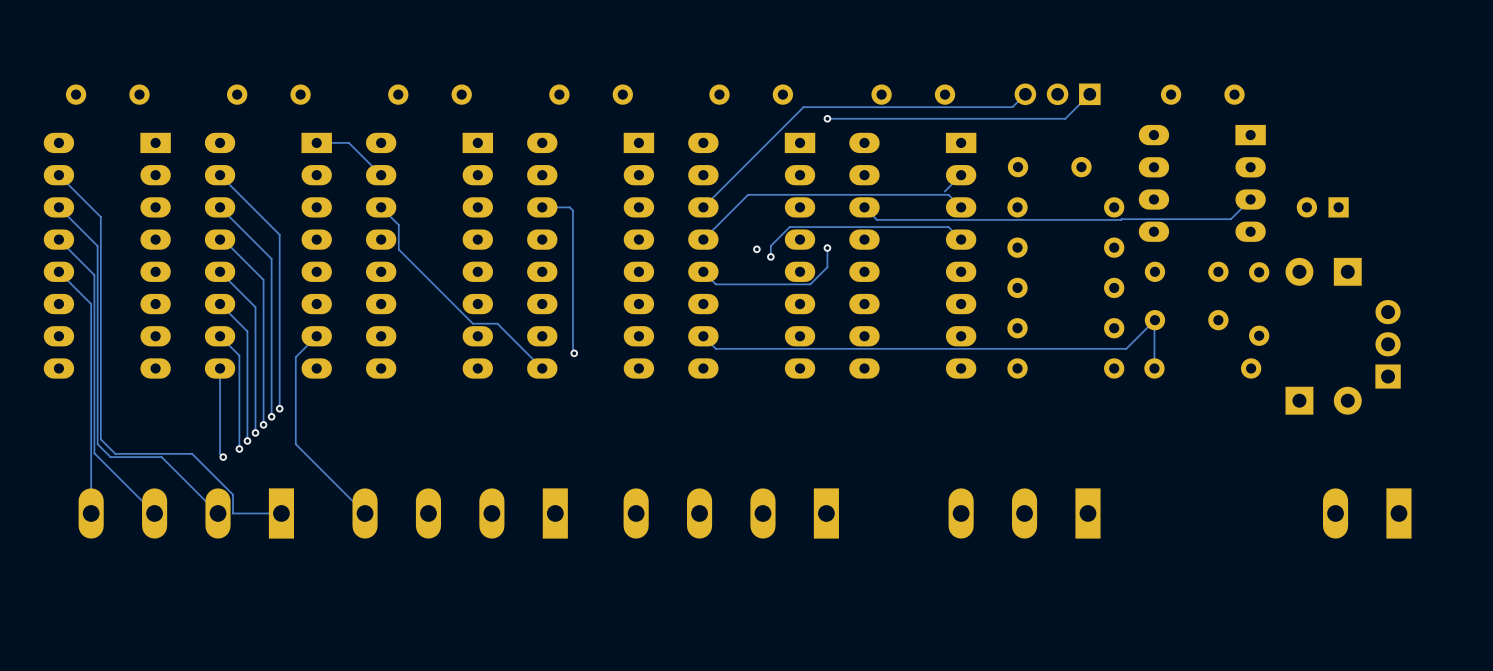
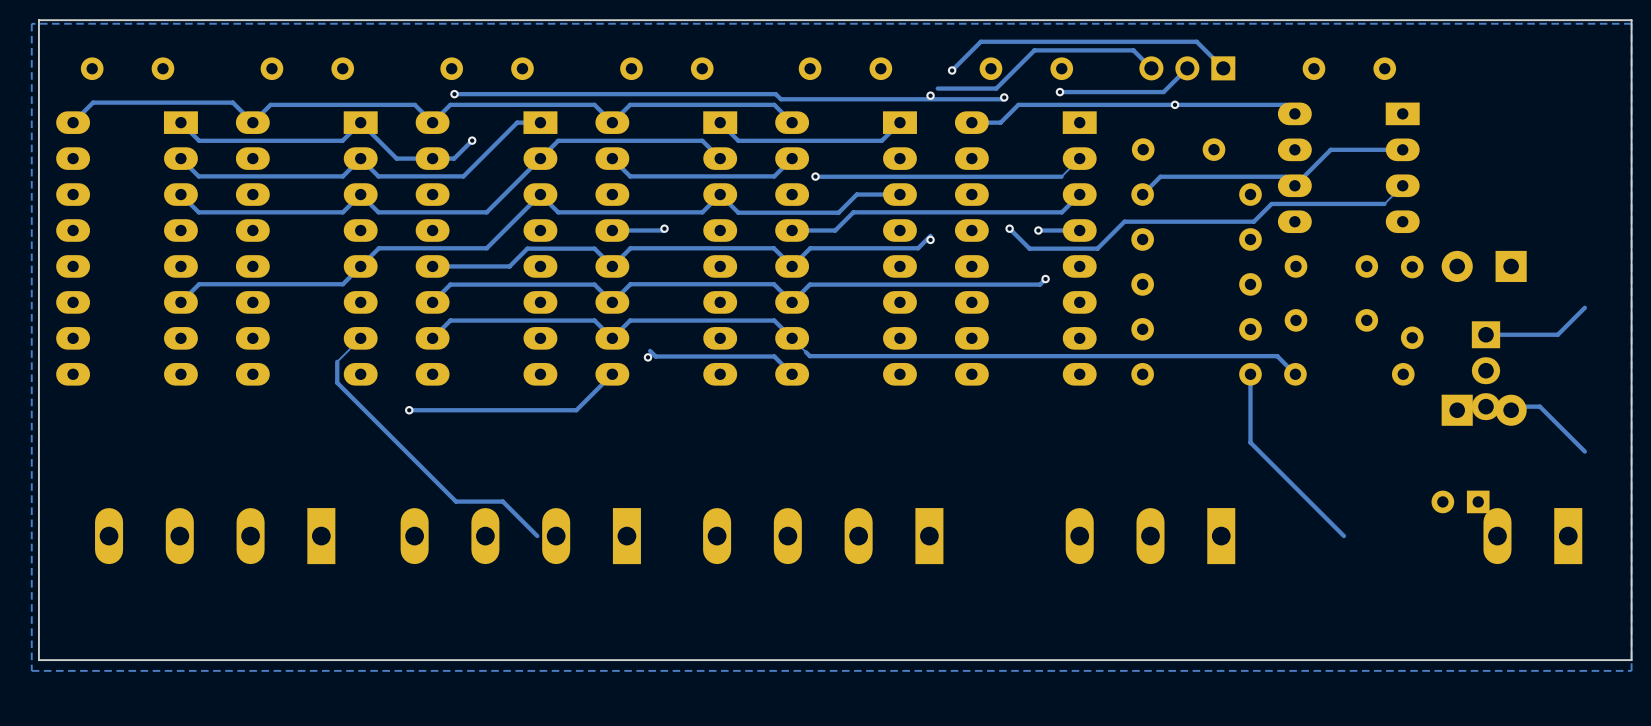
board edge: none -> (1631, 20) (38, 20) (38, 660) (1631, 660) (1631, 20)
zone outline: none -> (1631, 23) (31, 23) (31, 670) (1631, 670) (1631, 23)
track: (1025, 94) (1012, 107) (803, 107) (703, 207) -> (1151, 68) (1133, 50) (1034, 50) (996, 88) (937, 88)
track: none -> (1187, 68) (1163, 92) (1059, 92)
track: (1089, 94) (1065, 118) (827, 118) -> (1223, 68) (1196, 41) (980, 41) (952, 70)
via: none -> (952, 70)
via: none -> (1059, 92)
track: none -> (454, 94) (775, 94) (780, 99) (1002, 99) (1004, 97)
via: none -> (454, 94)
via: none -> (1004, 97)
via: none -> (1175, 104)
track: none -> (1294, 113) (1285, 104) (1018, 104) (1000, 122) (971, 122)
track: none -> (180, 122) (199, 140) (342, 140) (360, 122) (396, 158) (454, 158) (472, 140)
track: (316, 142) (348, 142) (381, 175) -> none
track: none -> (540, 122) (517, 122) (463, 176) (378, 176) (360, 158) (342, 176) (198, 176) (180, 158)
track: none -> (792, 122) (774, 104) (630, 104) (612, 122) (594, 104) (450, 104) (432, 122) (414, 104) (270, 104) (252, 122) (232, 102) (93, 102) (73, 122)
track: none -> (899, 122) (881, 140) (738, 140) (720, 122)
via: none -> (472, 140)
track: none -> (1402, 149) (1330, 149) (1294, 185) (1285, 176) (1160, 176) (1142, 194)
track: (58, 175) (100, 217) (100, 439) (115, 453) (192, 453) (232, 494) (232, 513) (281, 513) -> none
track: (220, 175) (279, 234) (279, 408) -> none
track: none -> (720, 158) (702, 140) (558, 140) (486, 212) (378, 212) (360, 194) (342, 212) (198, 212) (180, 194)
track: none -> (792, 158) (774, 176) (630, 176) (612, 158)
via: none -> (815, 176)
track: none -> (1061, 176) (815, 176)
track: (58, 207) (97, 246) (97, 444) (110, 457) (161, 457) (218, 513) -> none
track: (220, 207) (271, 258) (271, 416) -> none
track: (381, 207) (398, 225) (398, 249) (472, 323) (497, 323) (542, 368) -> (409, 410) (576, 410) (612, 374)
track: (542, 207) (569, 207) (572, 210) (574, 353) -> none
track: none -> (899, 194) (856, 194) (838, 212) (738, 212) (720, 194) (702, 212) (558, 212) (540, 194) (486, 248) (378, 248) (342, 284) (199, 284) (180, 302)
track: (864, 207) (877, 219) (1230, 219) (1234, 215) -> (1009, 228) (1029, 248) (1097, 248) (1124, 221) (1253, 221) (1271, 203) (1384, 203)
track: (961, 207) (948, 194) (748, 194) (703, 239) -> (1079, 194) (1061, 212) (853, 212) (835, 230) (792, 230)
part position: (1322, 207) -> (1460, 501)
track: none -> (664, 228) (662, 230) (612, 230)
via: none -> (664, 228)
via: none -> (1009, 228)
track: (58, 239) (94, 275) (94, 453) (154, 513) -> none
track: (220, 239) (223, 239) (263, 279) (263, 424) -> none
via: none -> (1038, 230)
track: (961, 239) (948, 227) (789, 227) (770, 245) (770, 256) -> (1079, 230) (1038, 230)
track: none -> (930, 235) (918, 248) (810, 248) (792, 266) (773, 248) (630, 248) (612, 266) (594, 248) (527, 248) (509, 266) (432, 266)
track: (827, 248) (827, 267) (810, 284) (715, 284) (703, 271) -> none
via: (756, 249) -> none
via: (770, 256) -> none
track: (58, 271) (91, 304) (91, 513) -> none
track: (220, 271) (255, 307) (255, 432) -> none
track: none -> (1045, 279) (1040, 284) (809, 284) (792, 302) (773, 284) (630, 284) (612, 302) (594, 284) (450, 284) (432, 302)
via: none -> (1045, 279)
track: (220, 304) (247, 331) (247, 440) -> none
track: none -> (1584, 307) (1557, 334) (1485, 334)
track: (1154, 320) (1126, 348) (715, 348) -> (1295, 374) (1277, 356) (809, 356) (806, 352)
track: (1154, 320) (1154, 368) -> none
track: (220, 336) (239, 355) (239, 449) -> none
track: none -> (792, 338) (774, 320) (630, 320) (612, 338) (594, 320) (450, 320) (432, 338)
part rotation: 0° (1388, 344) -> 180° (1485, 370)
part position: (1388, 344) -> (1485, 370)
track: none -> (650, 350) (655, 356) (774, 356) (792, 374)
track: (295, 357) (295, 444) (365, 513) -> (337, 361) (337, 382) (455, 501) (502, 501) (537, 536)
track: (220, 368) (220, 453) (223, 457) -> none
track: none -> (1250, 374) (1250, 442) (1343, 536)
track: none -> (1485, 406) (1539, 406) (1584, 451)
via: none -> (409, 410)
via: (279, 408) -> none
via: (271, 416) -> none
via: (263, 424) -> none
via: (255, 432) -> none
via: (247, 440) -> none
via: (239, 449) -> none
via: (223, 457) -> none

